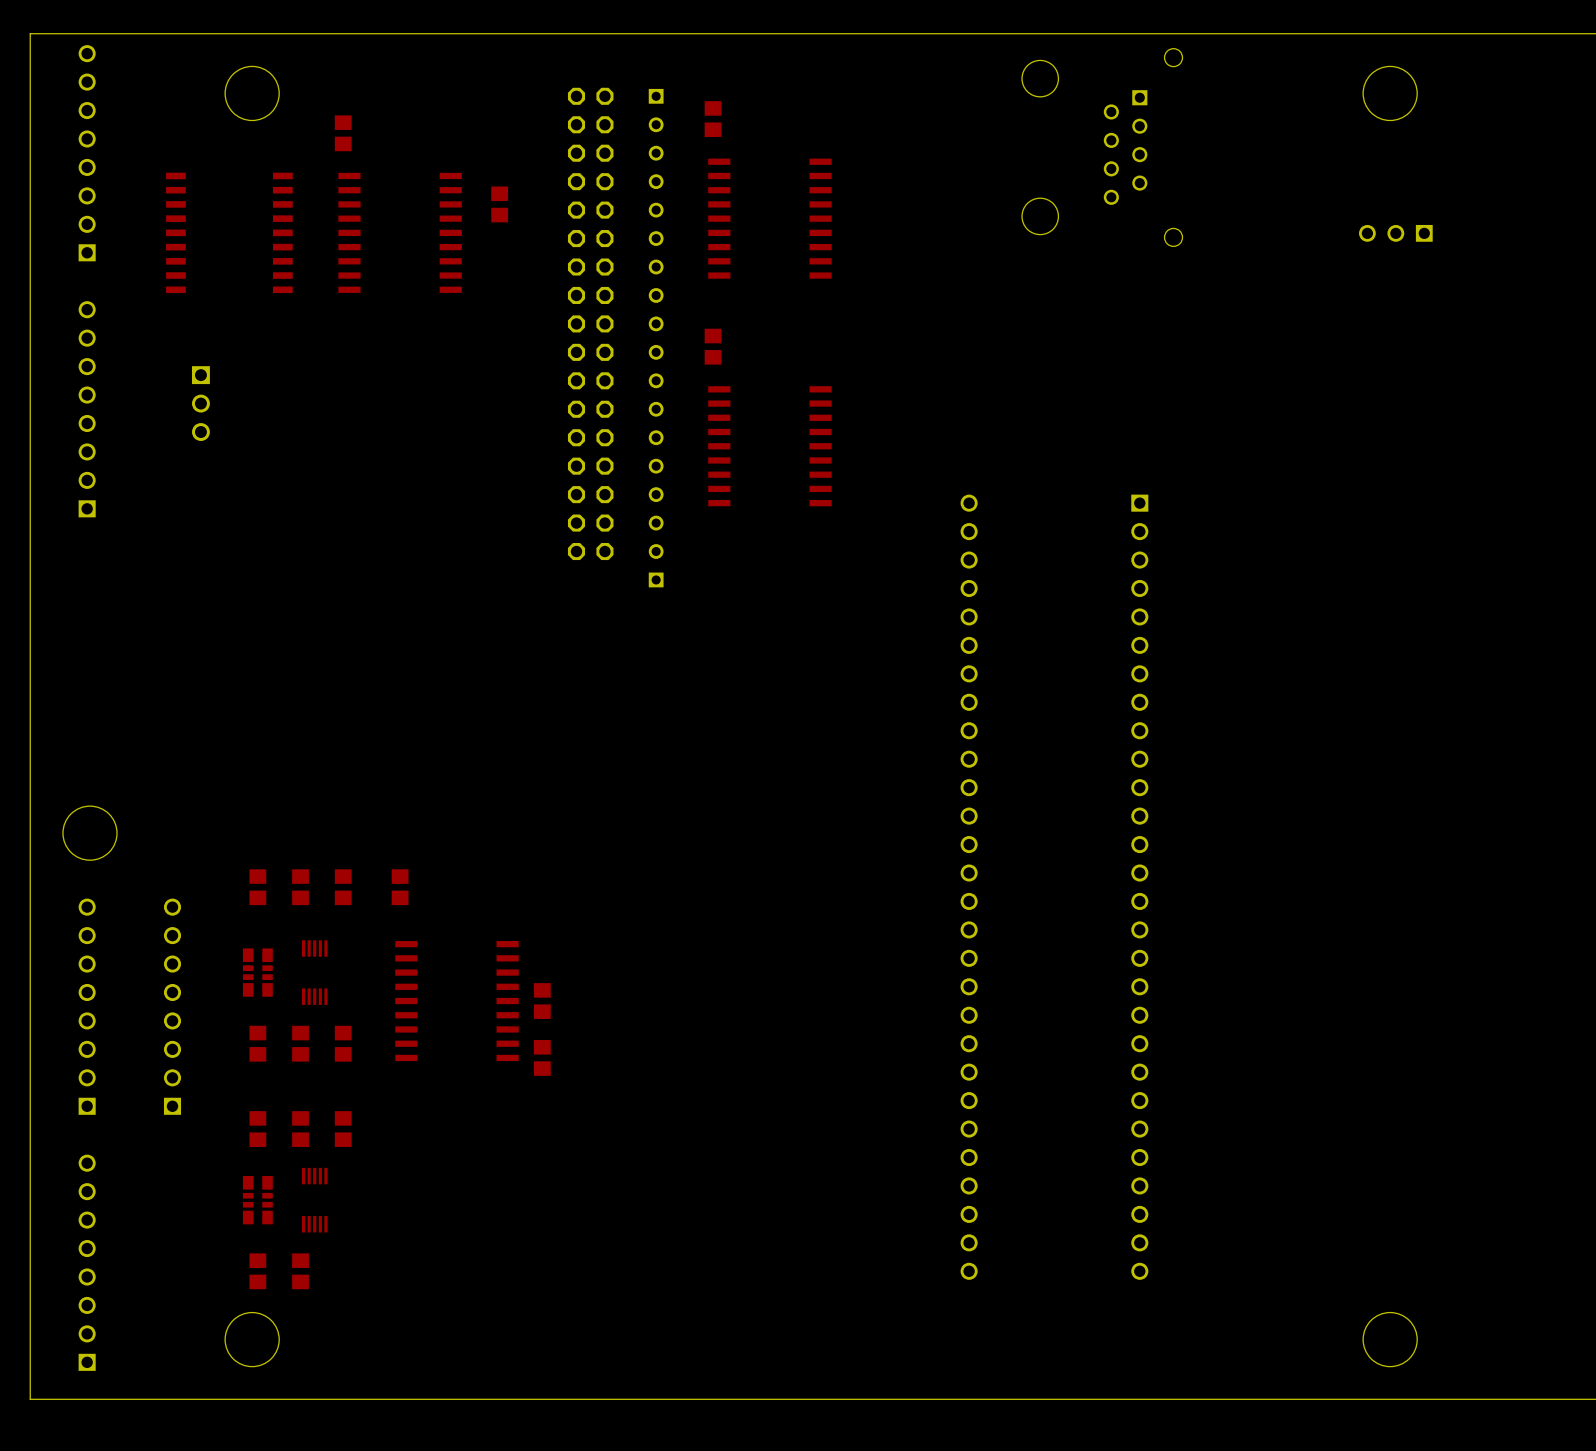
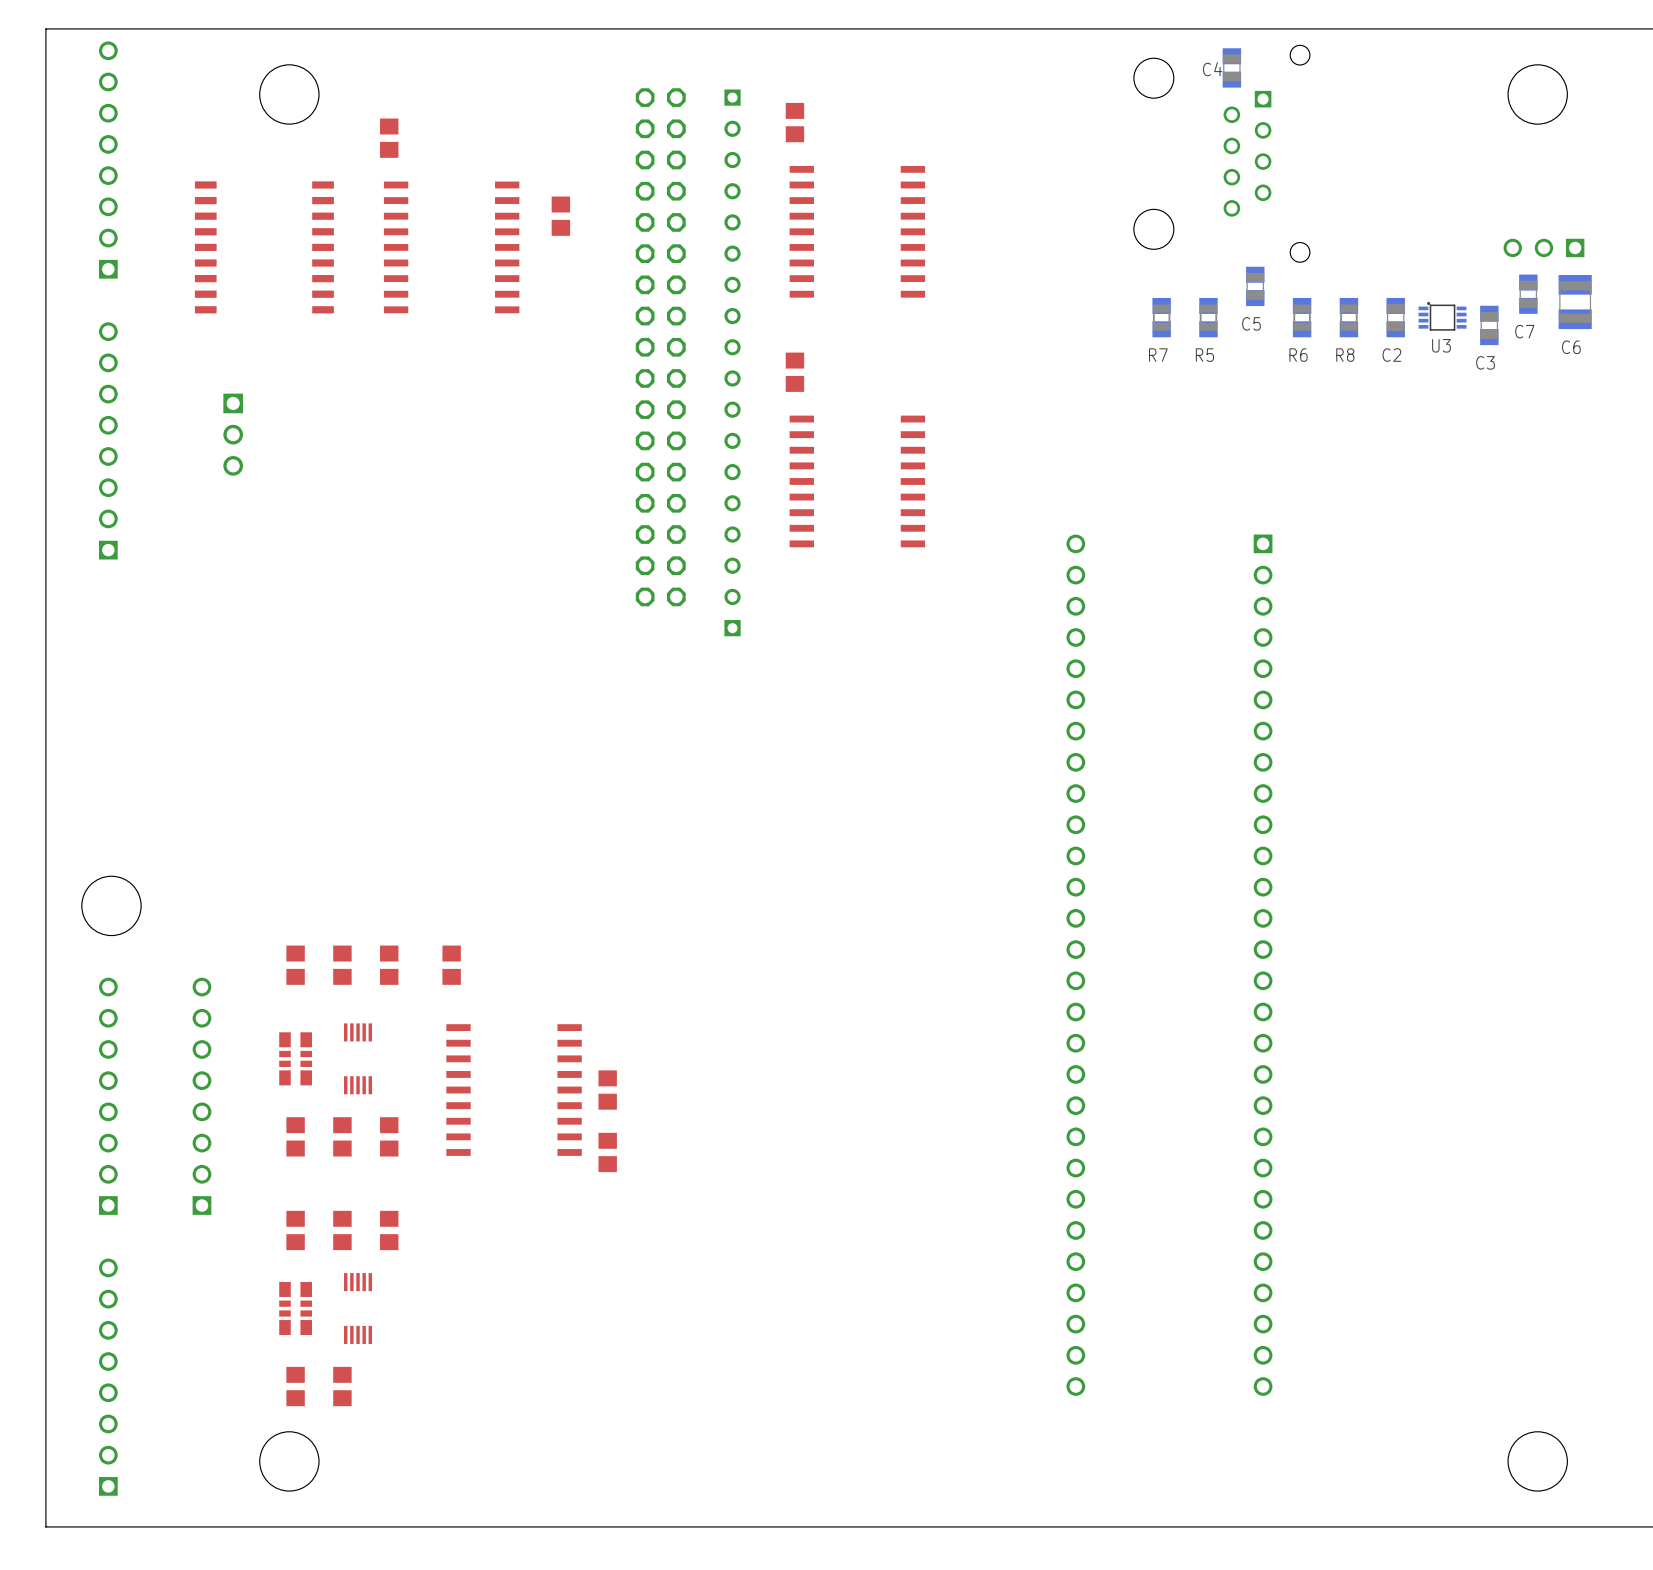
C4: none -> (1231, 67)
C5: none -> (1255, 286)
C7: none -> (1528, 294)
C6: none -> (1575, 302)
U3: none -> (1442, 316)
R7: none -> (1161, 317)
R5: none -> (1208, 317)
R6: none -> (1302, 317)
R8: none -> (1348, 317)
C2: none -> (1395, 317)
C3: none -> (1489, 325)

